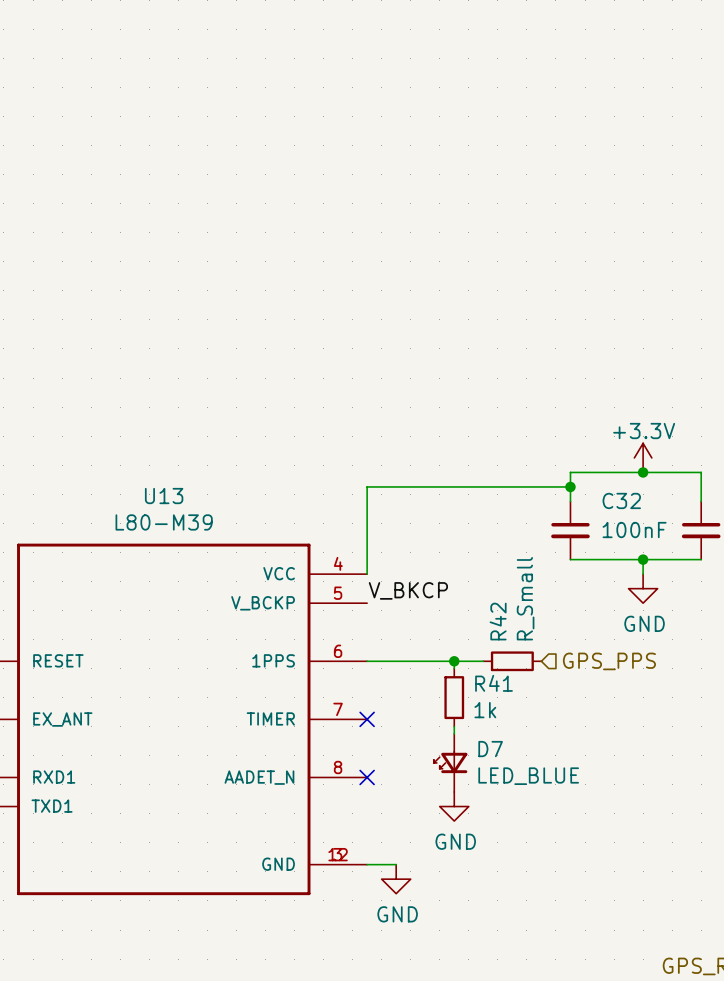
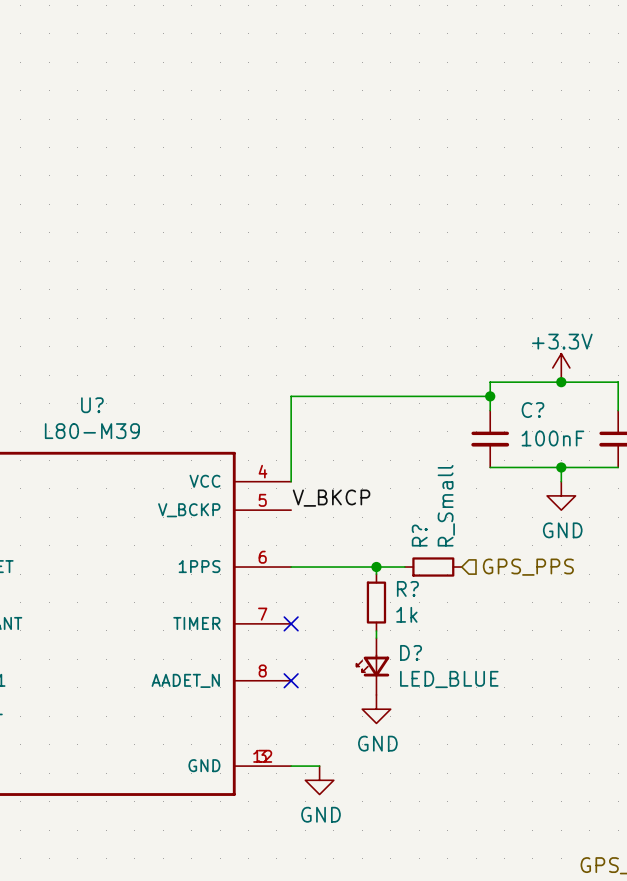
U13 name: U13 (164, 496) -> U? (92, 405)
C32 name: C32 (621, 500) -> C? (532, 410)
R42 name: R42 (498, 621) -> R? (419, 535)
R41 name: R41 (494, 683) -> R? (407, 588)
D7 name: D7 (490, 749) -> D? (411, 652)

